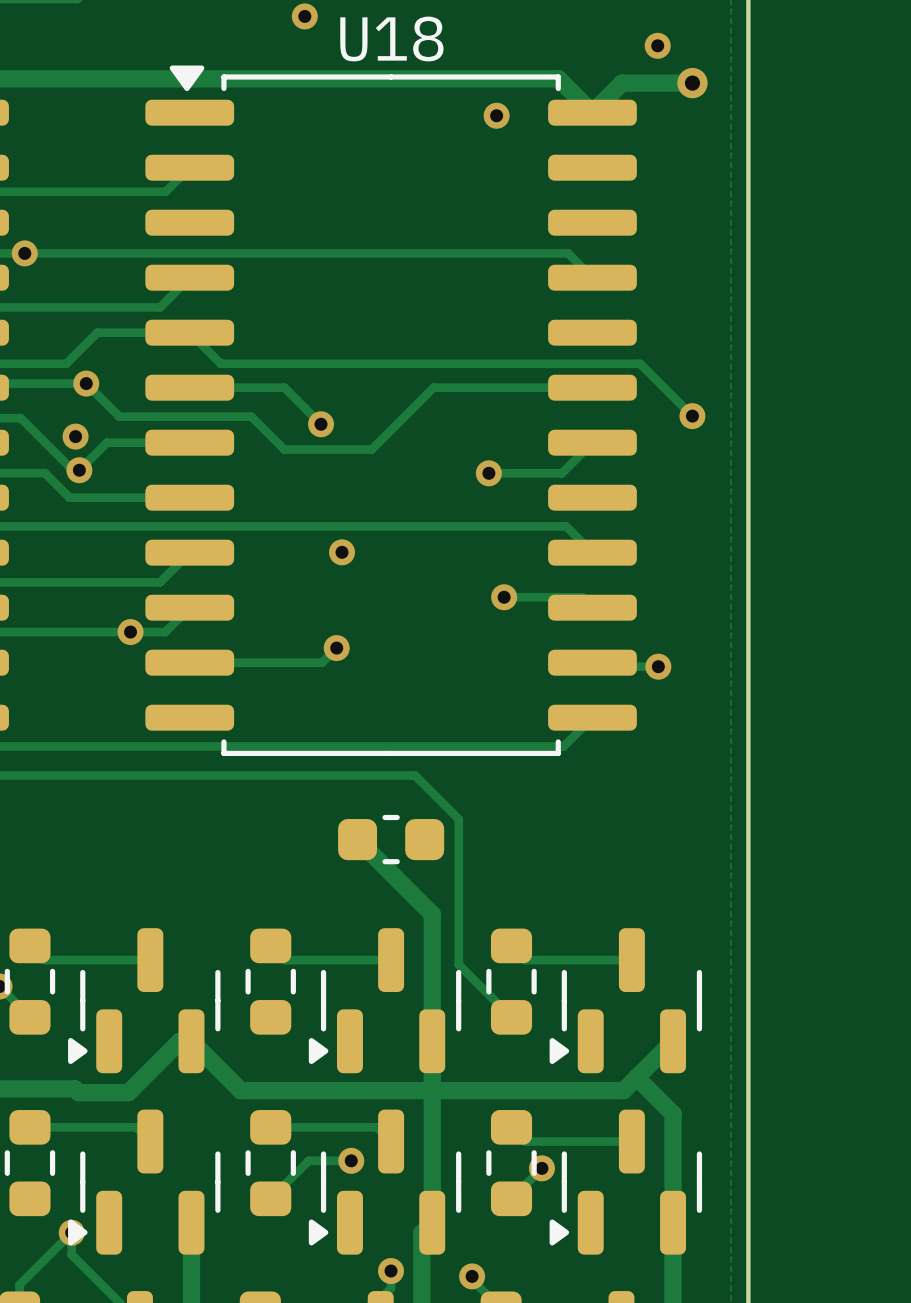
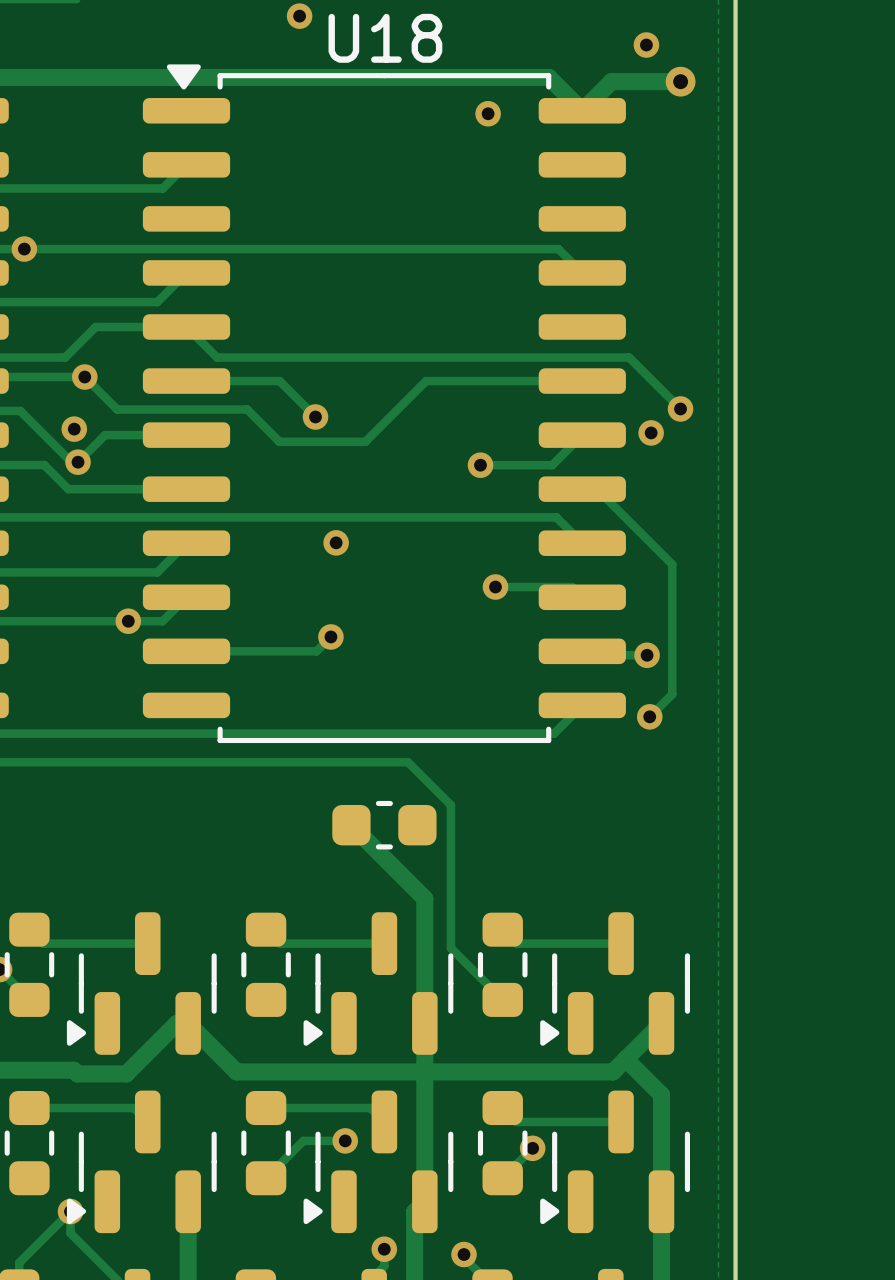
via: none -> (651, 432)
track: none -> (582, 489) (596, 489) (672, 564) (672, 694) (649, 716)
via: none -> (649, 716)

